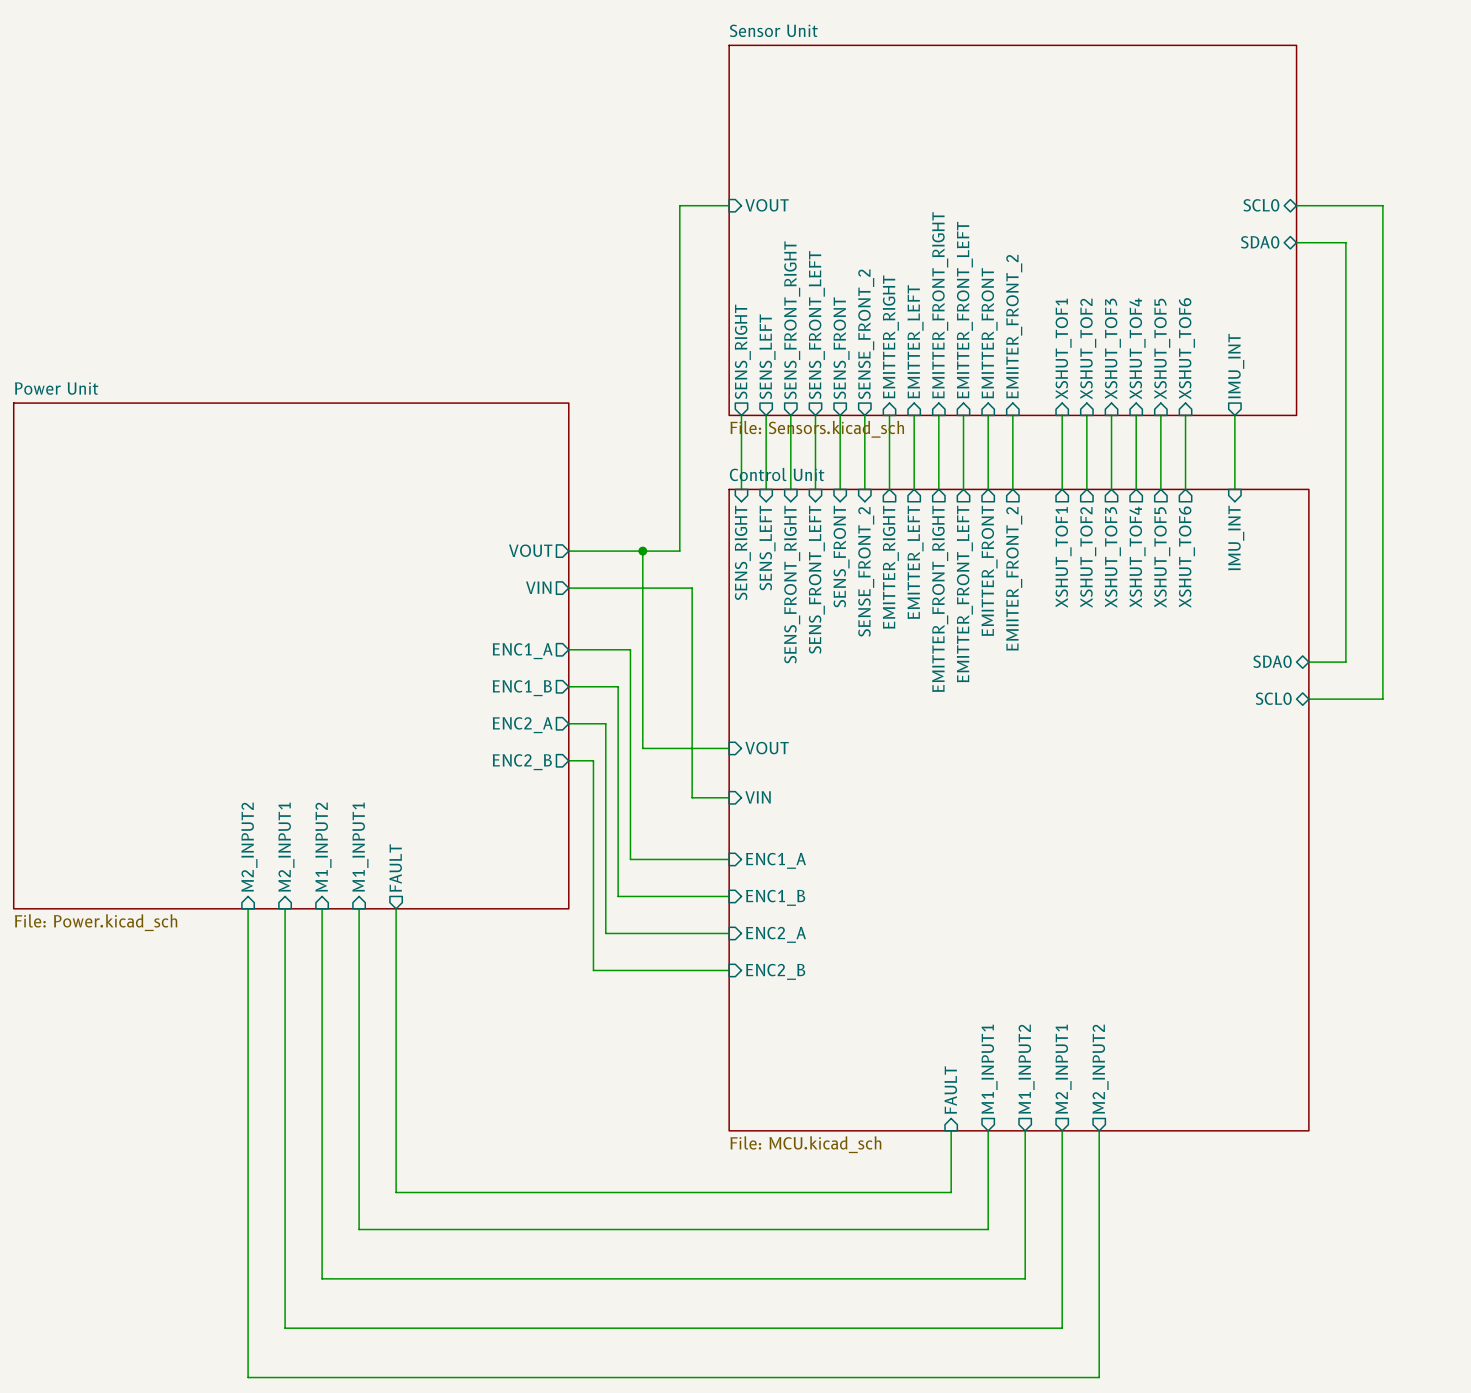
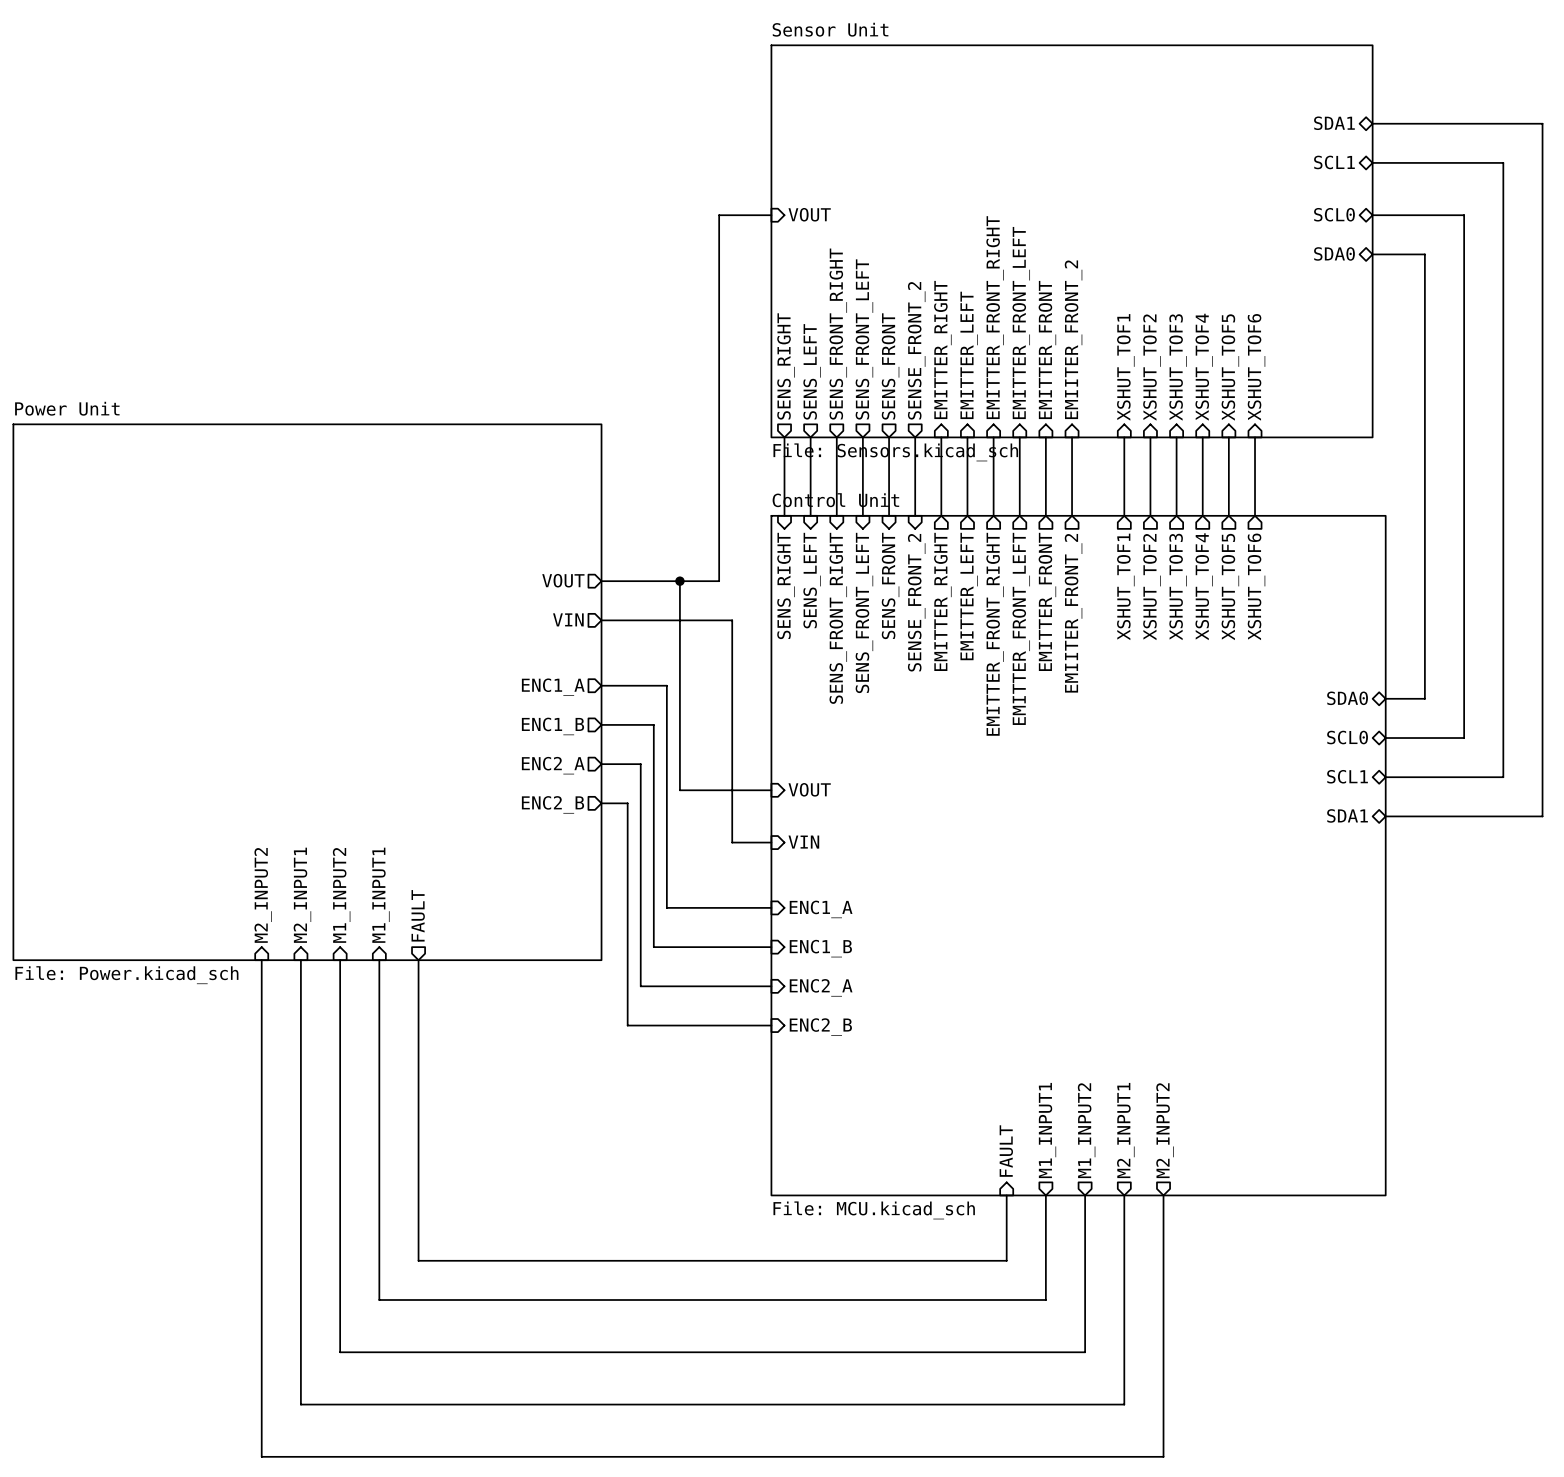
sheet pin: none -> SDA1 (1334, 123)
wire: none -> (1372, 123) (1542, 123) (1542, 816) (1385, 816)
sheet pin: none -> SCL1 (1334, 162)
wire: none -> (1372, 162) (1503, 162) (1503, 777) (1385, 777)
sheet pin: IMU_INT (1236, 366) -> none
wire: (1234, 415) (1234, 489) -> none
sheet pin: IMU_INT (1236, 538) -> none
sheet pin: none -> SCL1 (1347, 776)
sheet pin: none -> SDA1 (1347, 815)

